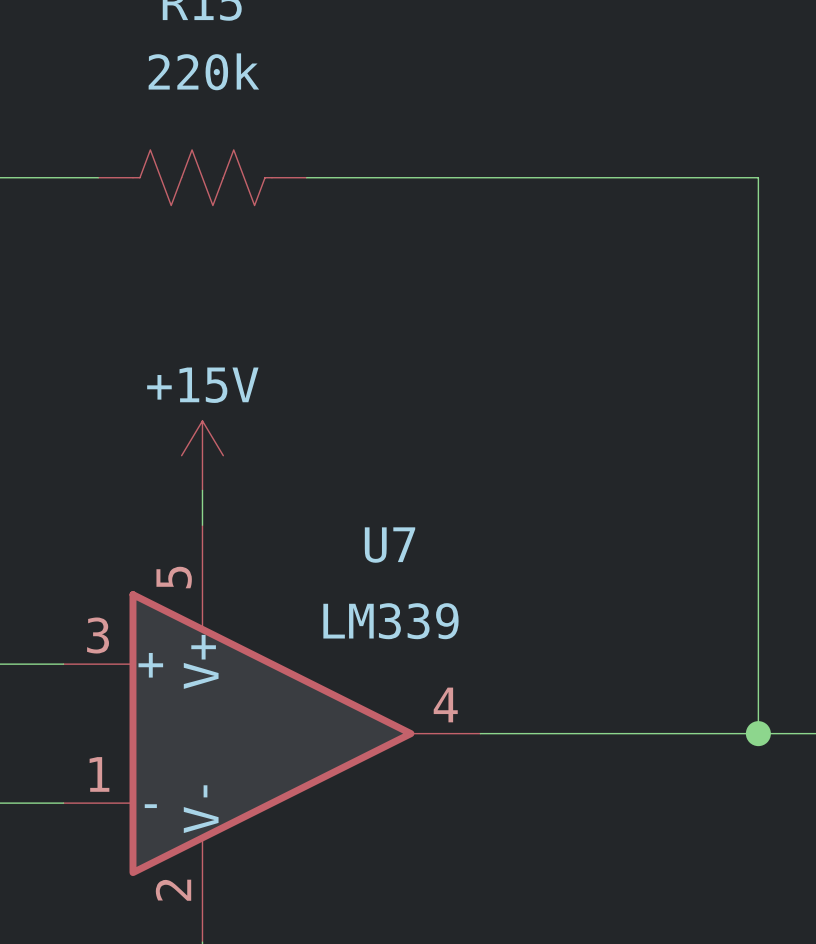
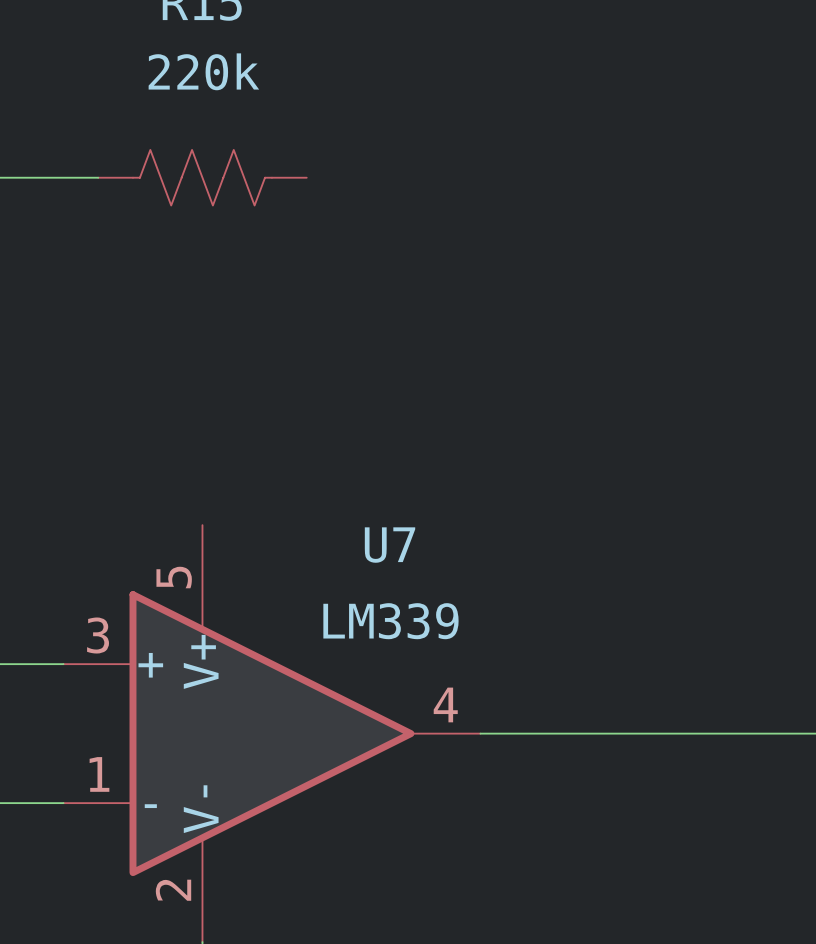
wire: (306, 177) (758, 177) (758, 733) -> none
power symbol: +15V (202, 455) -> none
wire: (202, 490) (202, 525) -> none
junction: (758, 733) -> none

